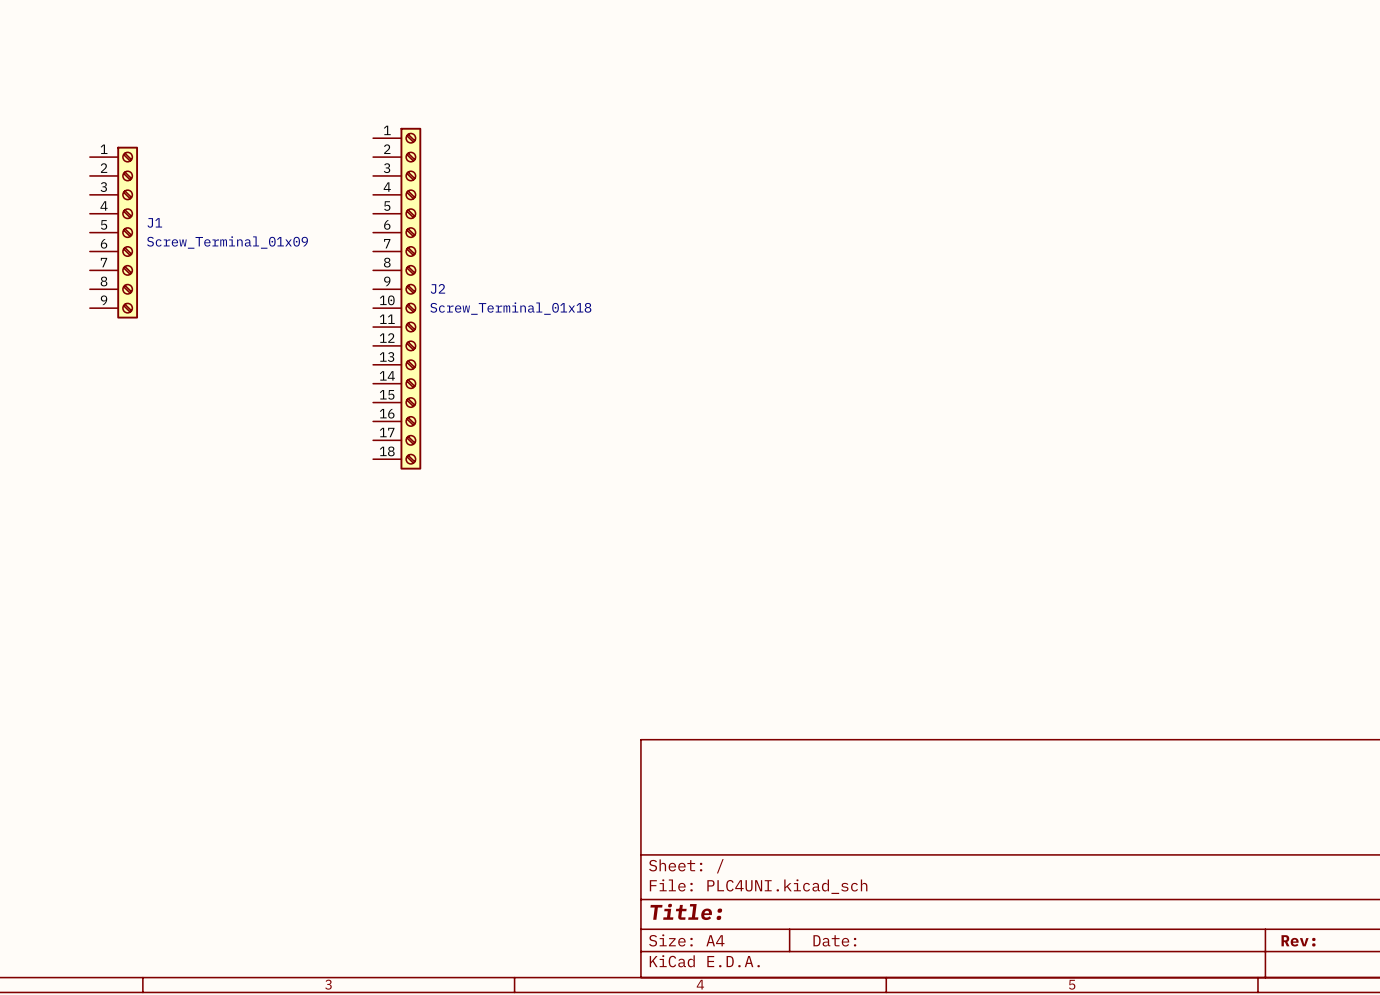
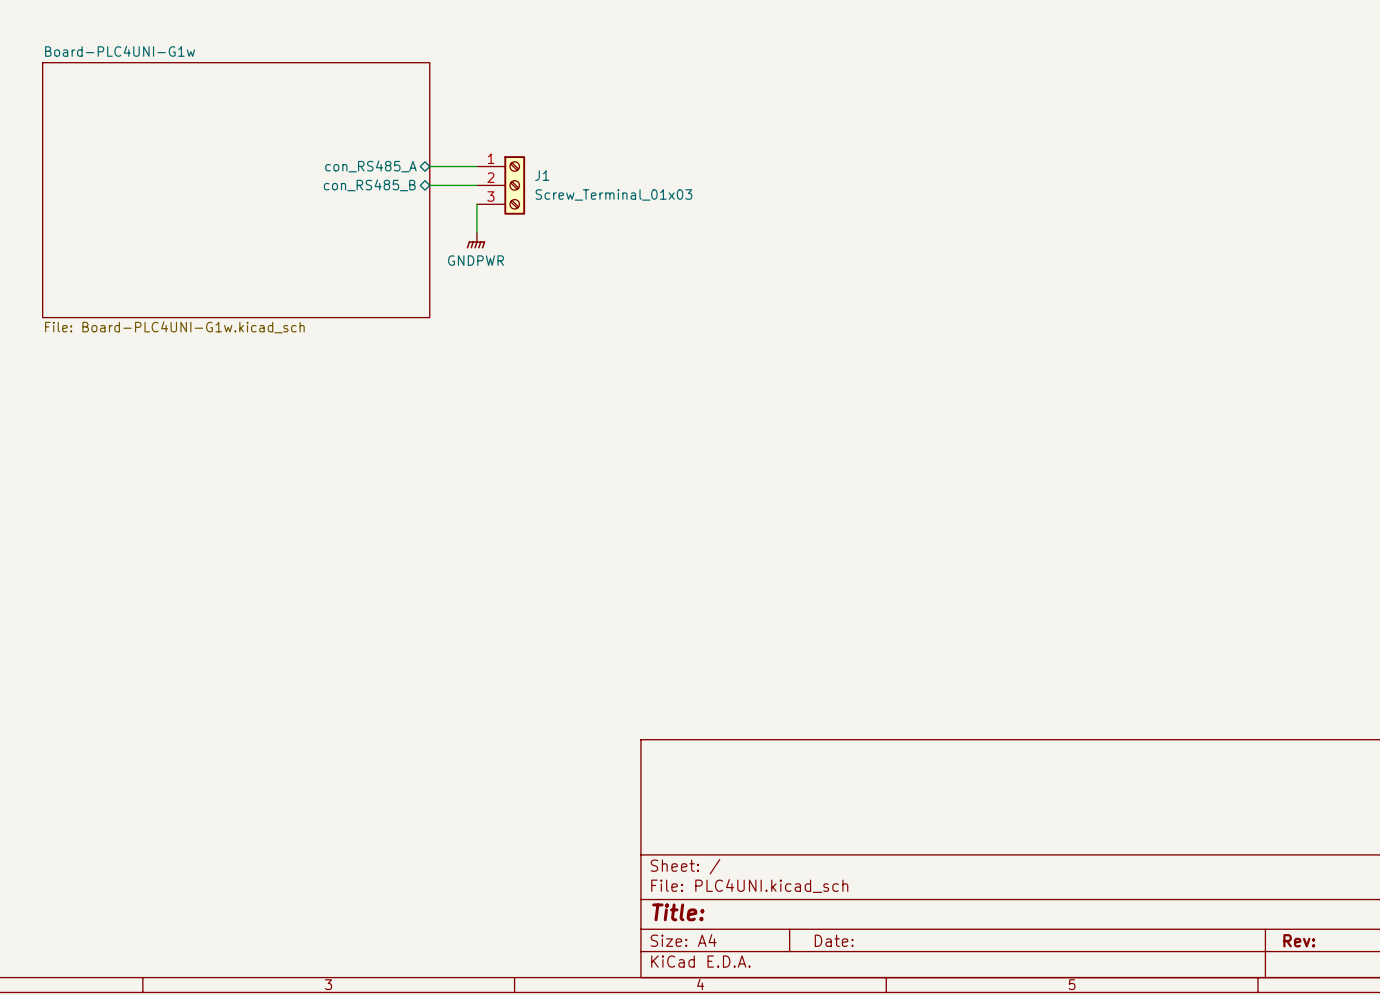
J1 symbol: [89, 146, 139, 319] -> [476, 156, 526, 215]
wire: none -> (429, 166) (476, 166)
sheet pin: none -> con_RS485_A (370, 166)
wire: none -> (429, 185) (476, 185)
sheet pin: none -> con_RS485_B (369, 185)
sheet Board-PLC4UNI-G1w: none -> File: Board-PLC4UNI-G1w.kicad_sch (236, 190)
wire: none -> (476, 204) (476, 232)
power symbol: none -> GNDPWR (476, 240)
J1 value: Screw_Terminal_01x09 (227, 242) -> Screw_Terminal_01x03 (613, 194)
J2: Screw_Terminal_01x18 (397, 298) -> none

